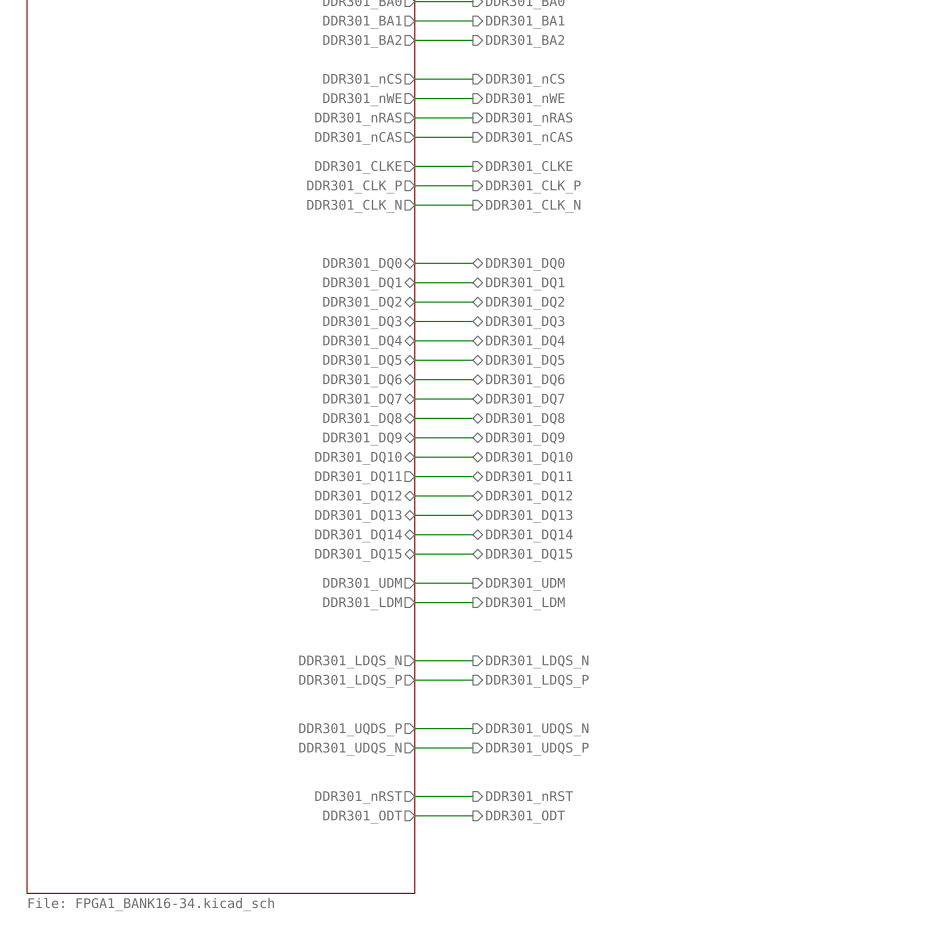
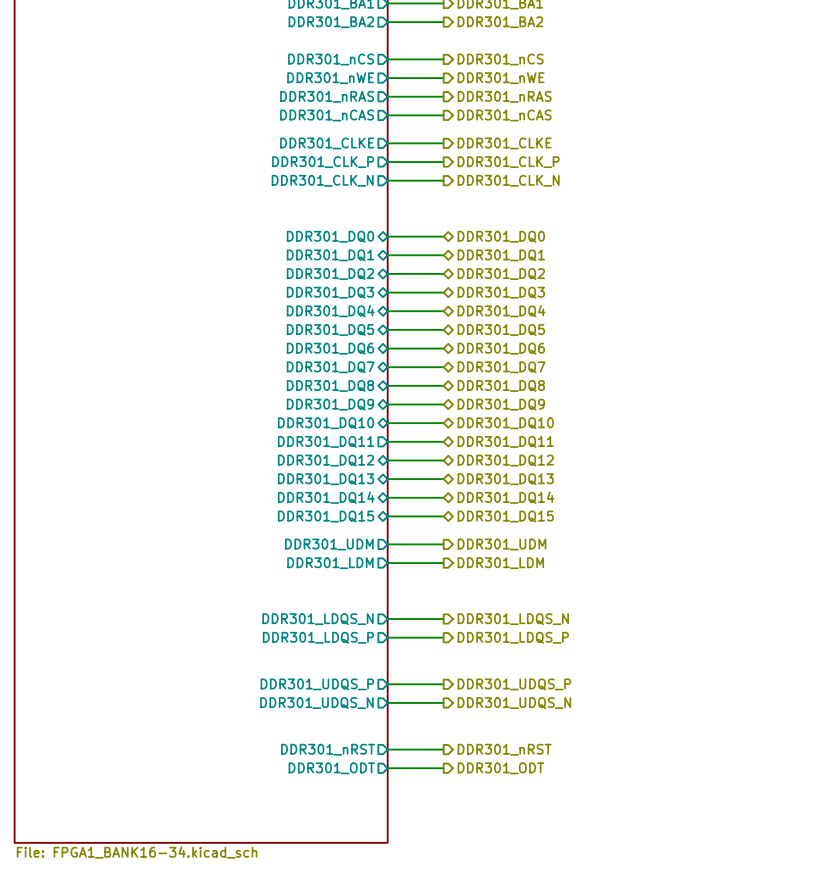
sheet pin: DDR301_UQDS_P (350, 729) -> DDR301_UDQS_P (317, 684)
hierarchical label: DDR301_UDQS_N (537, 729) -> DDR301_UDQS_P (514, 684)
hierarchical label: DDR301_UDQS_P (537, 749) -> DDR301_UDQS_N (514, 703)

